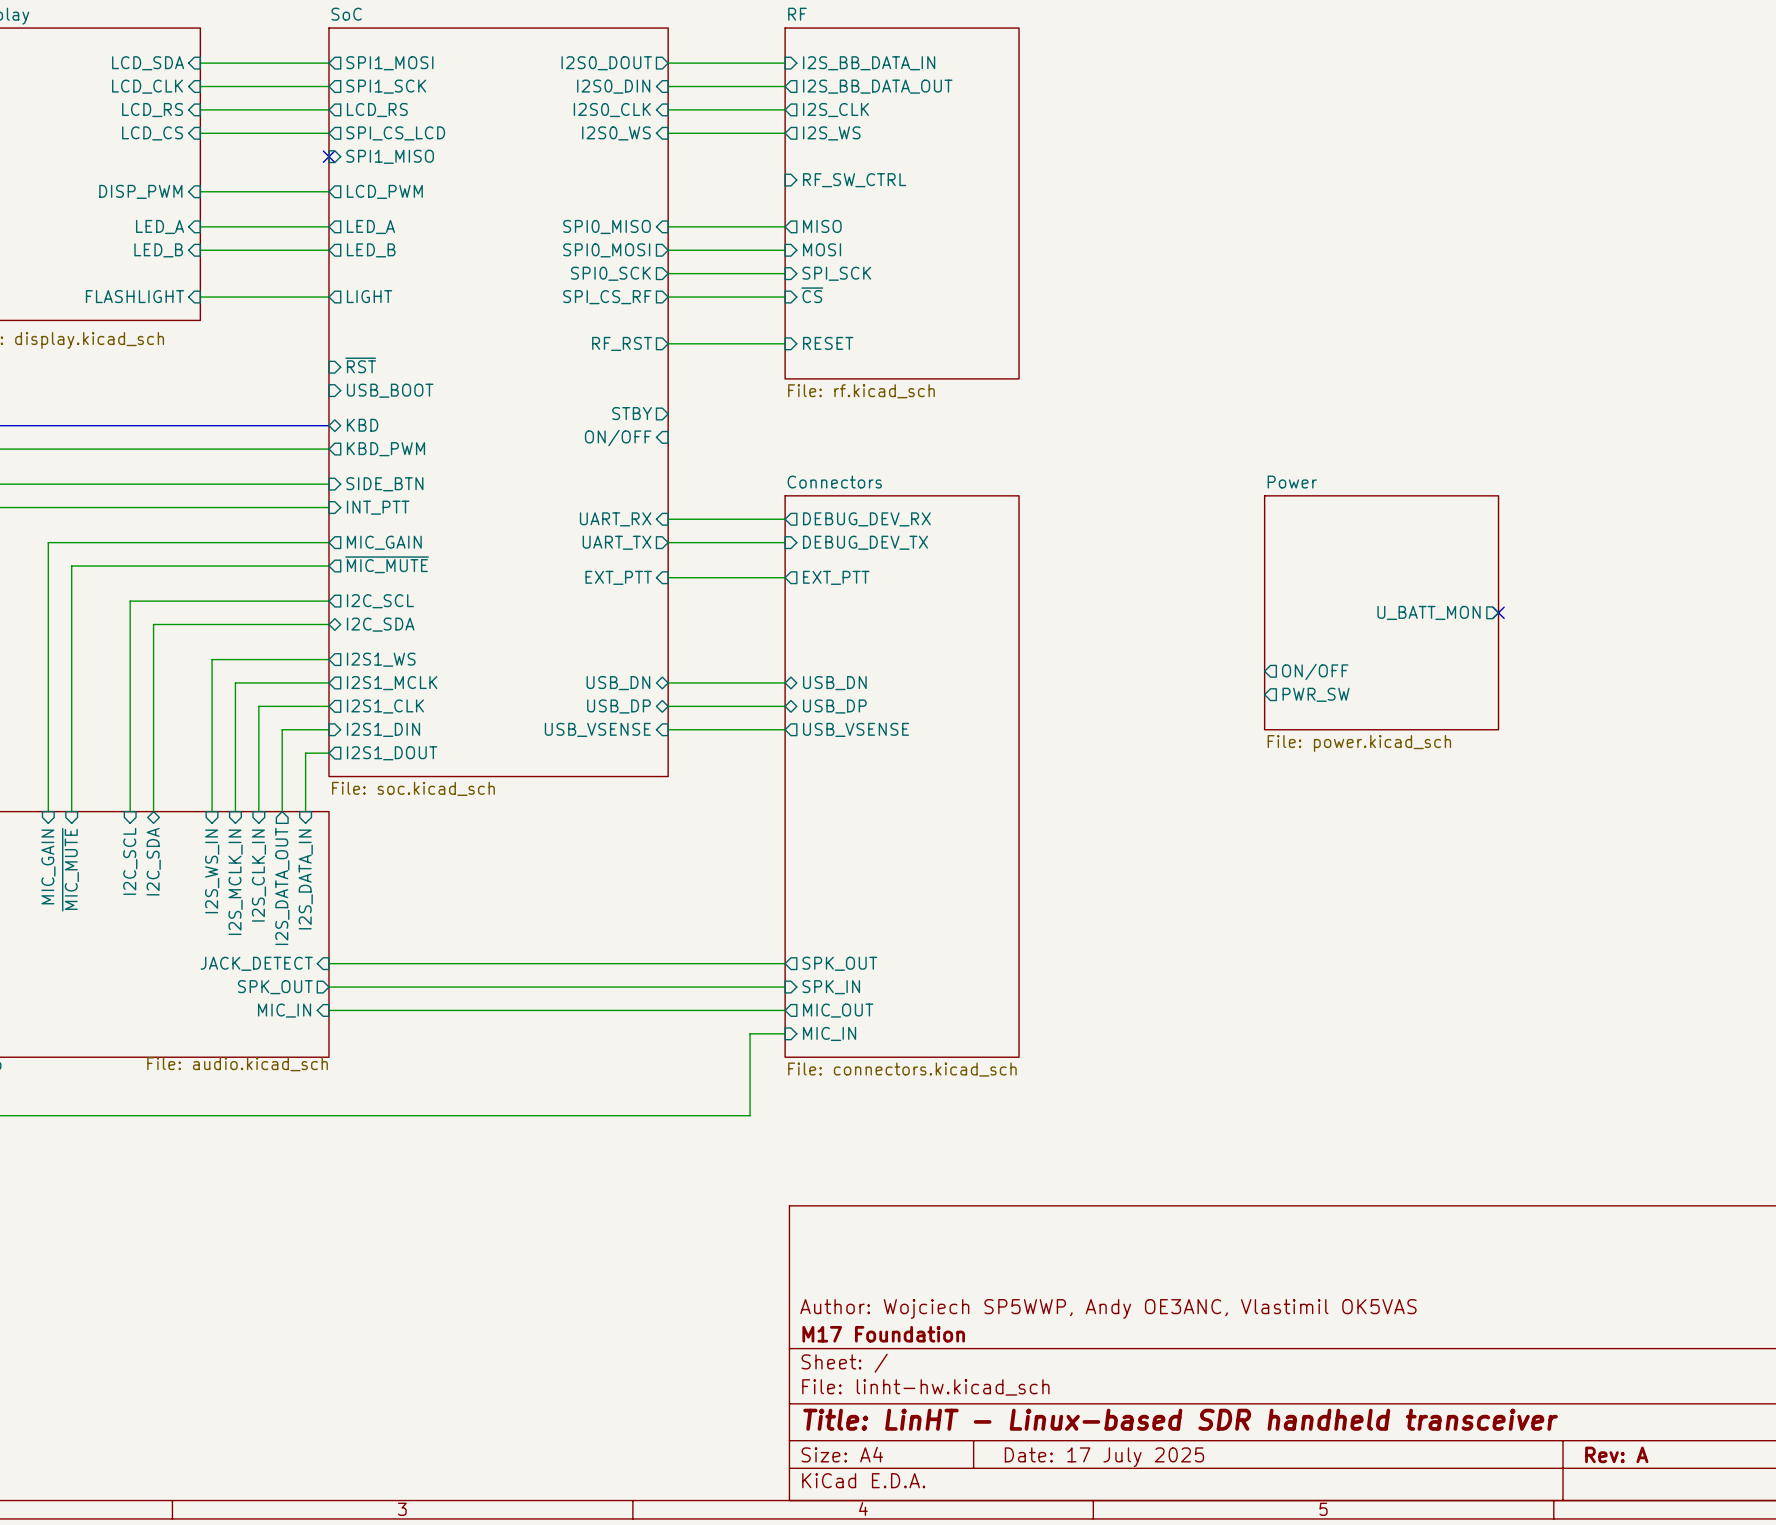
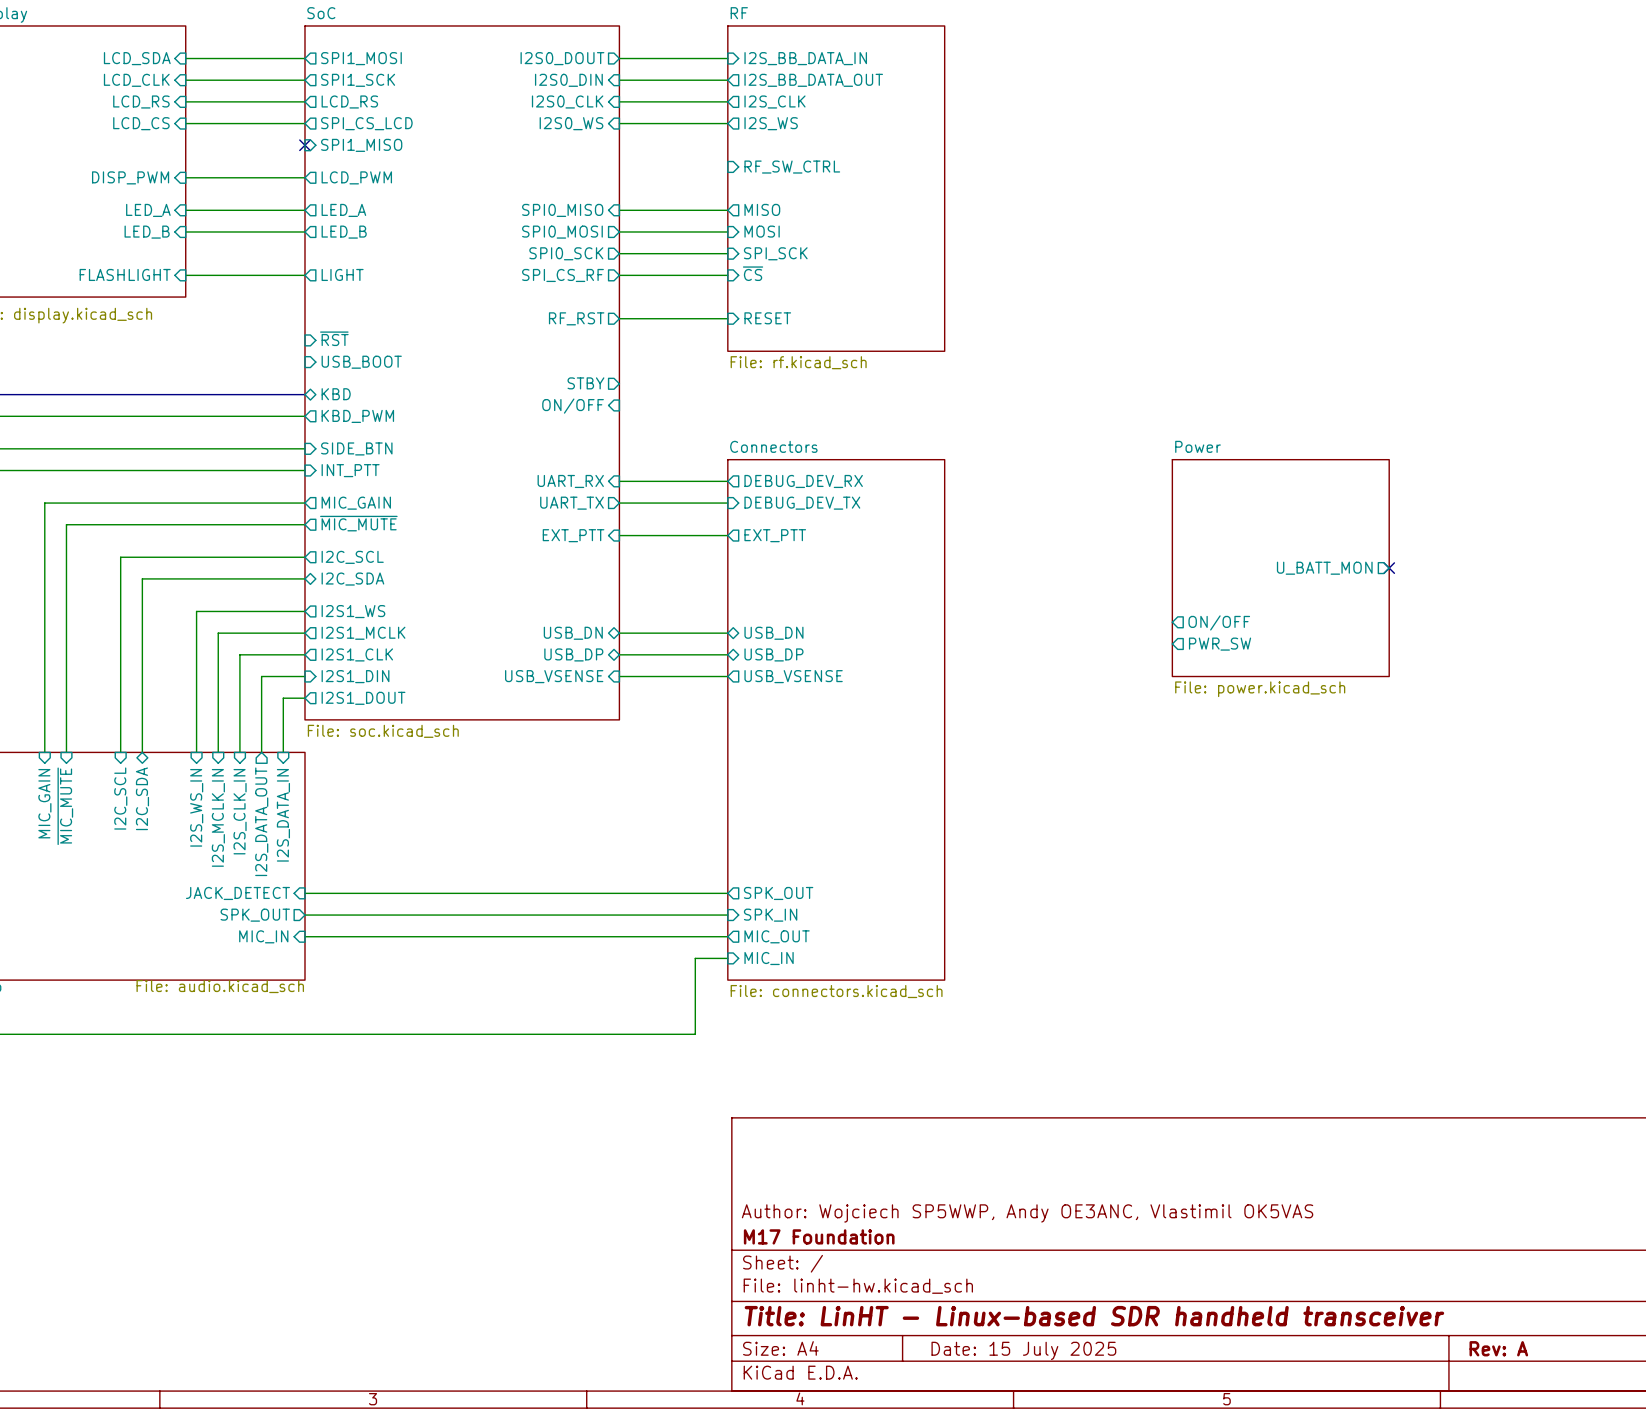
title block: Date: 17 July 2025 (1104, 1457) -> Date: 15 July 2025 (1023, 1350)

